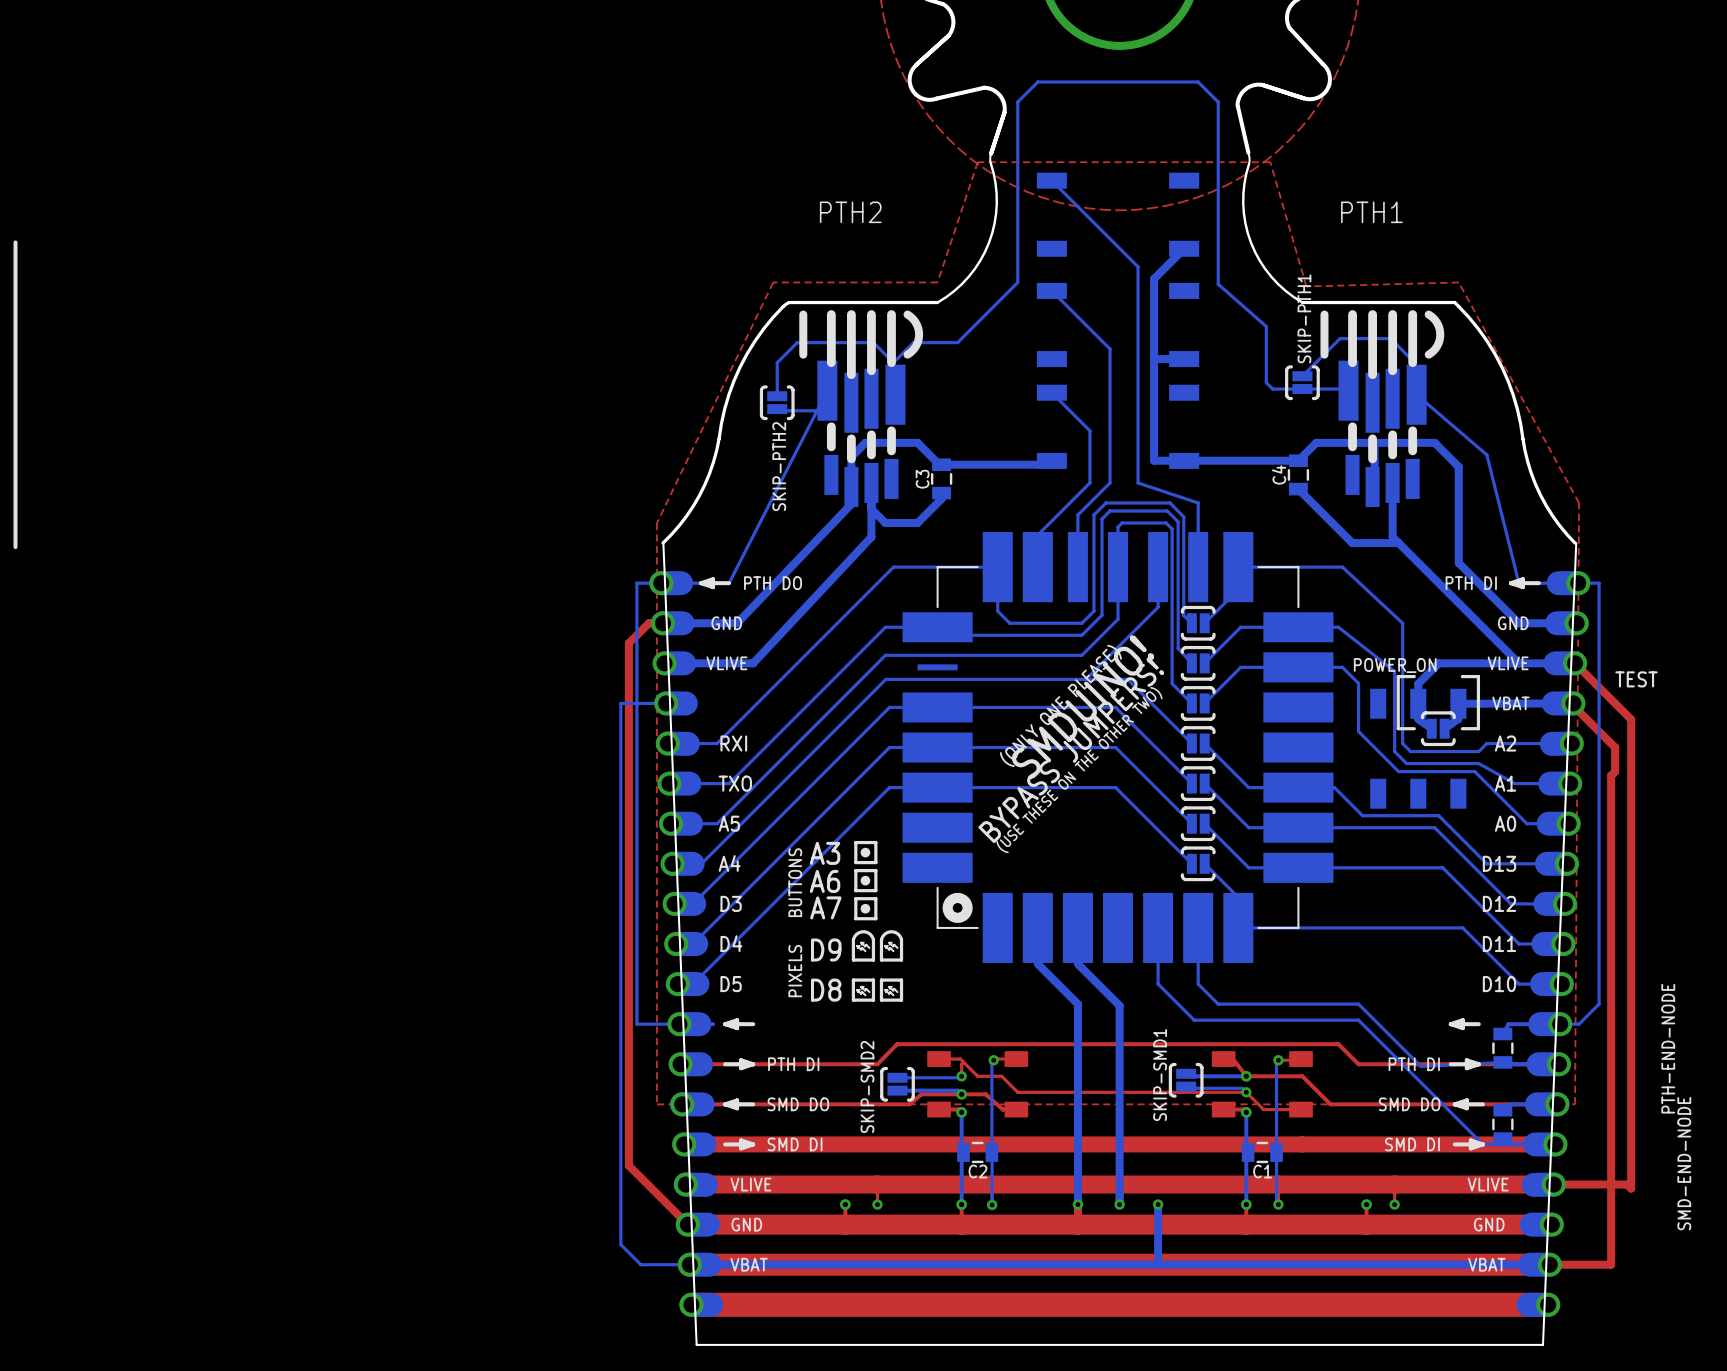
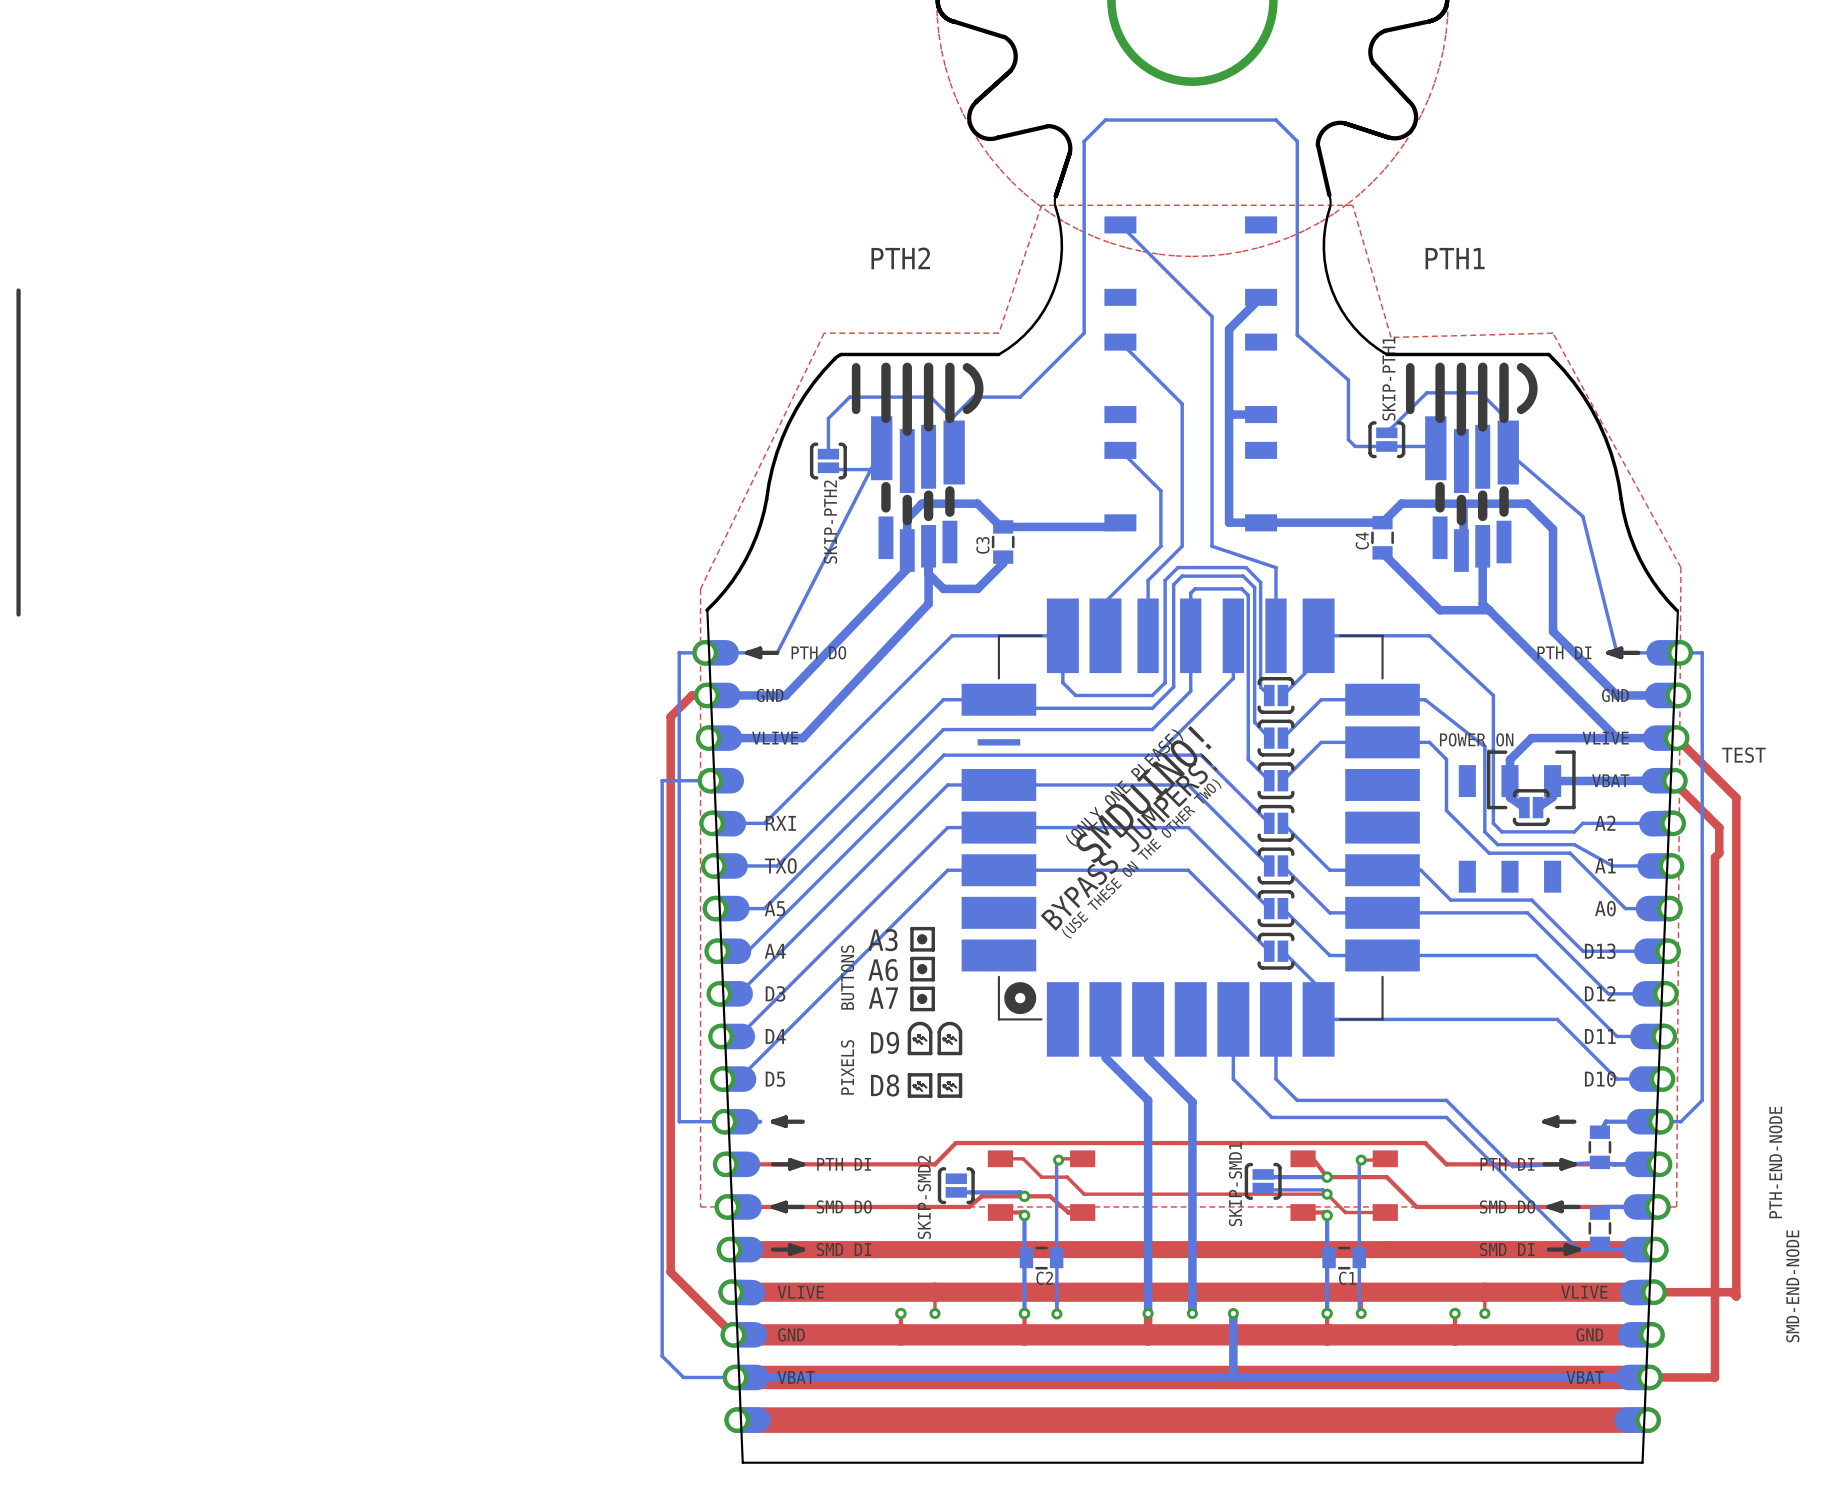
top track: (963, 1062) (961, 1064) (961, 1076) -> none
bottom track: (961, 1076) (897, 1077) -> none
via: (961, 1076) -> none

